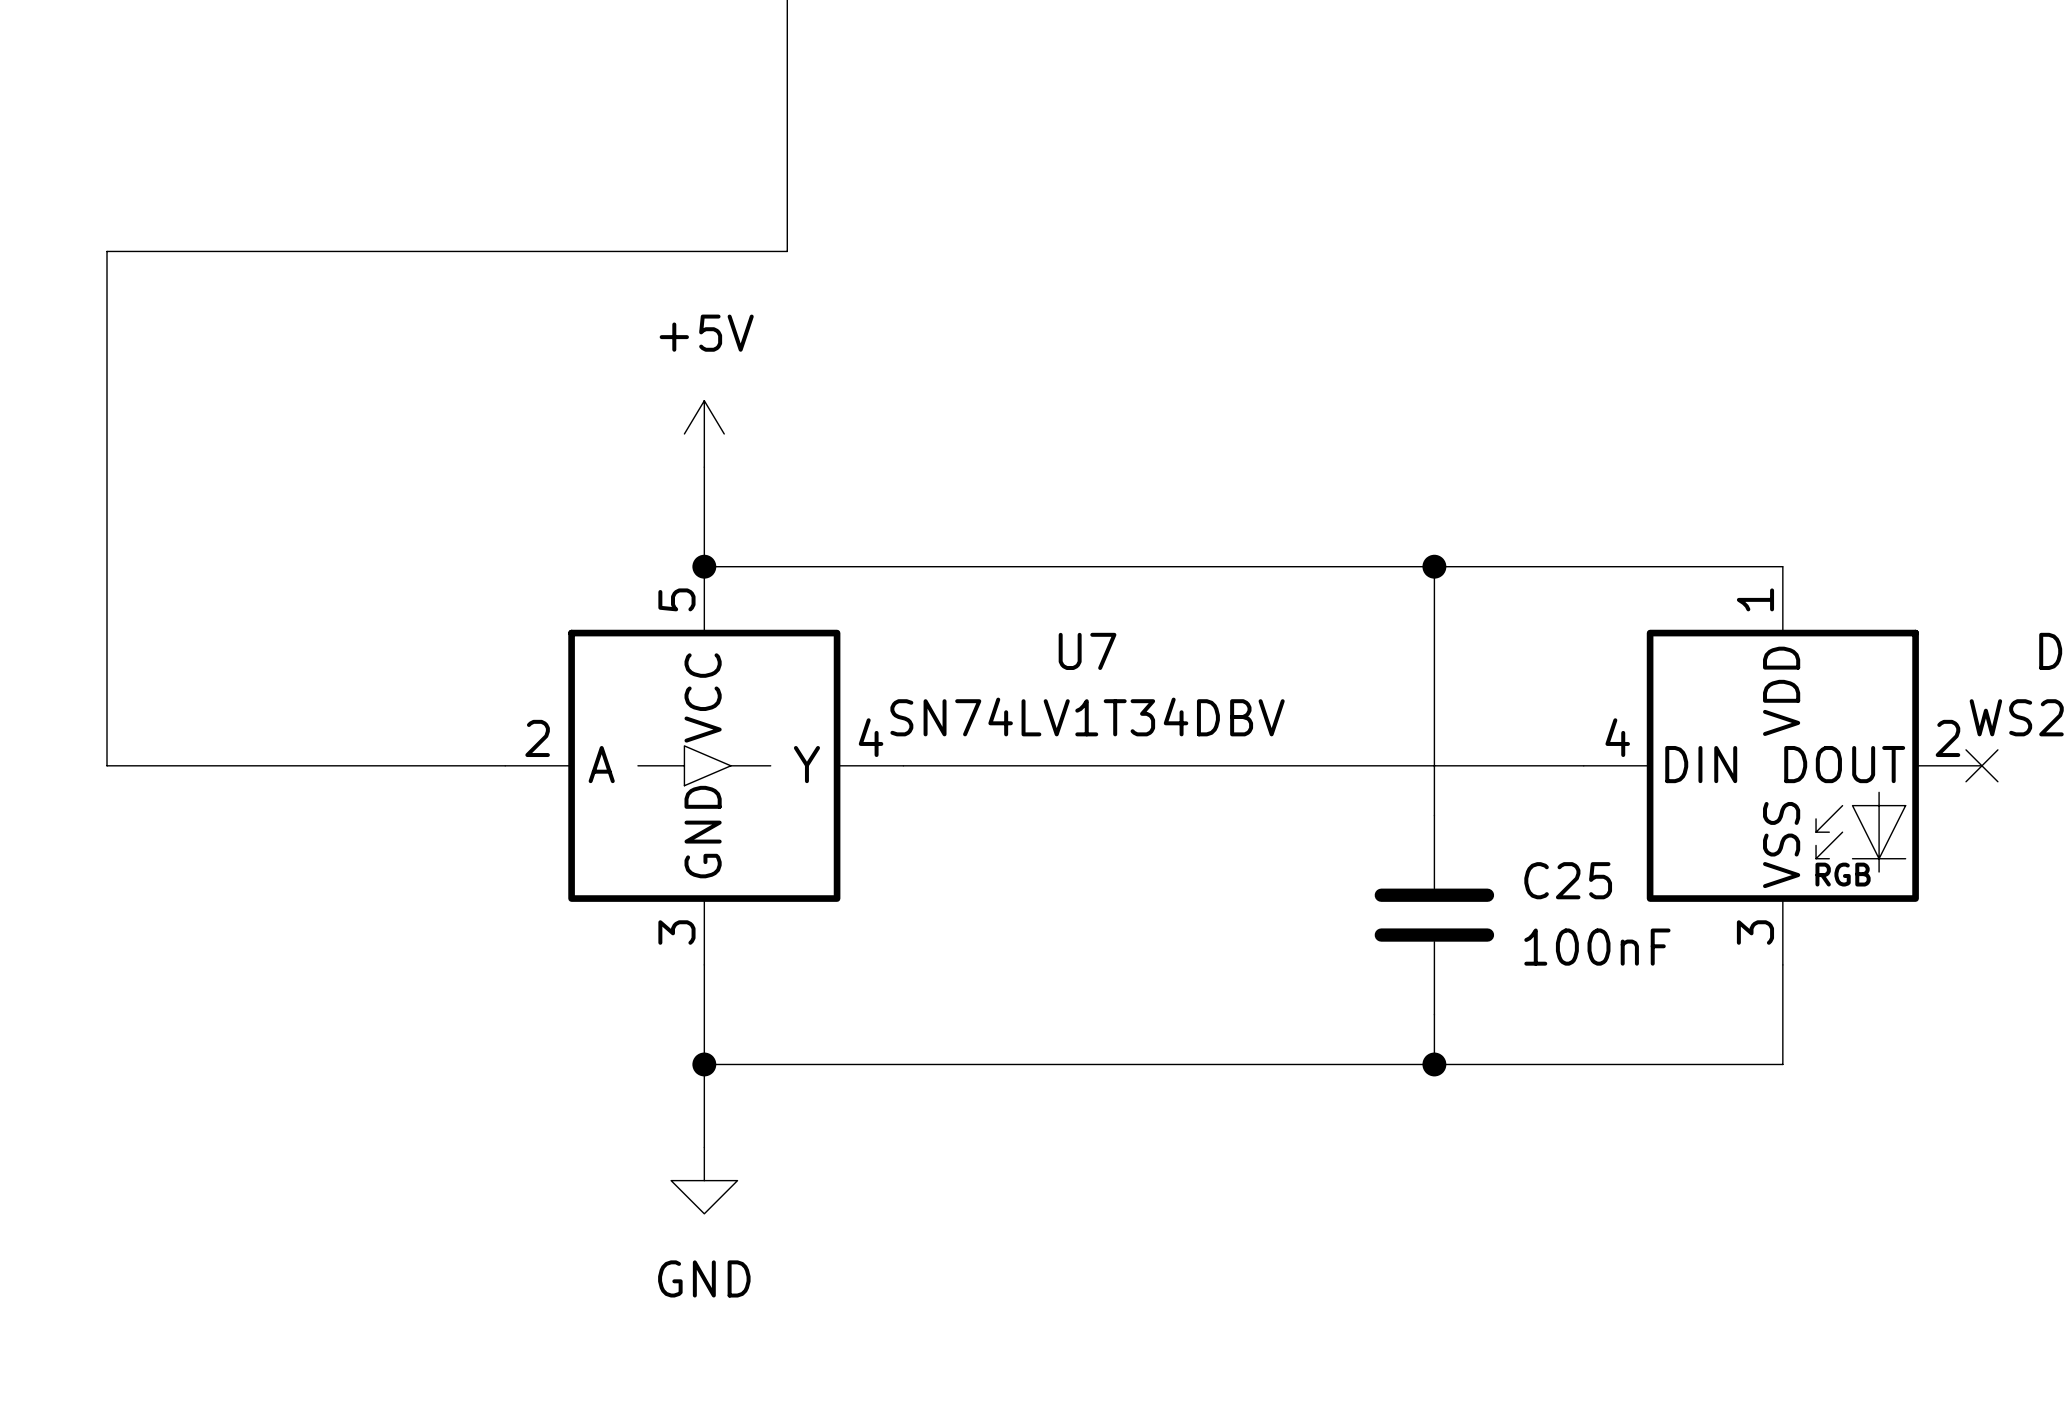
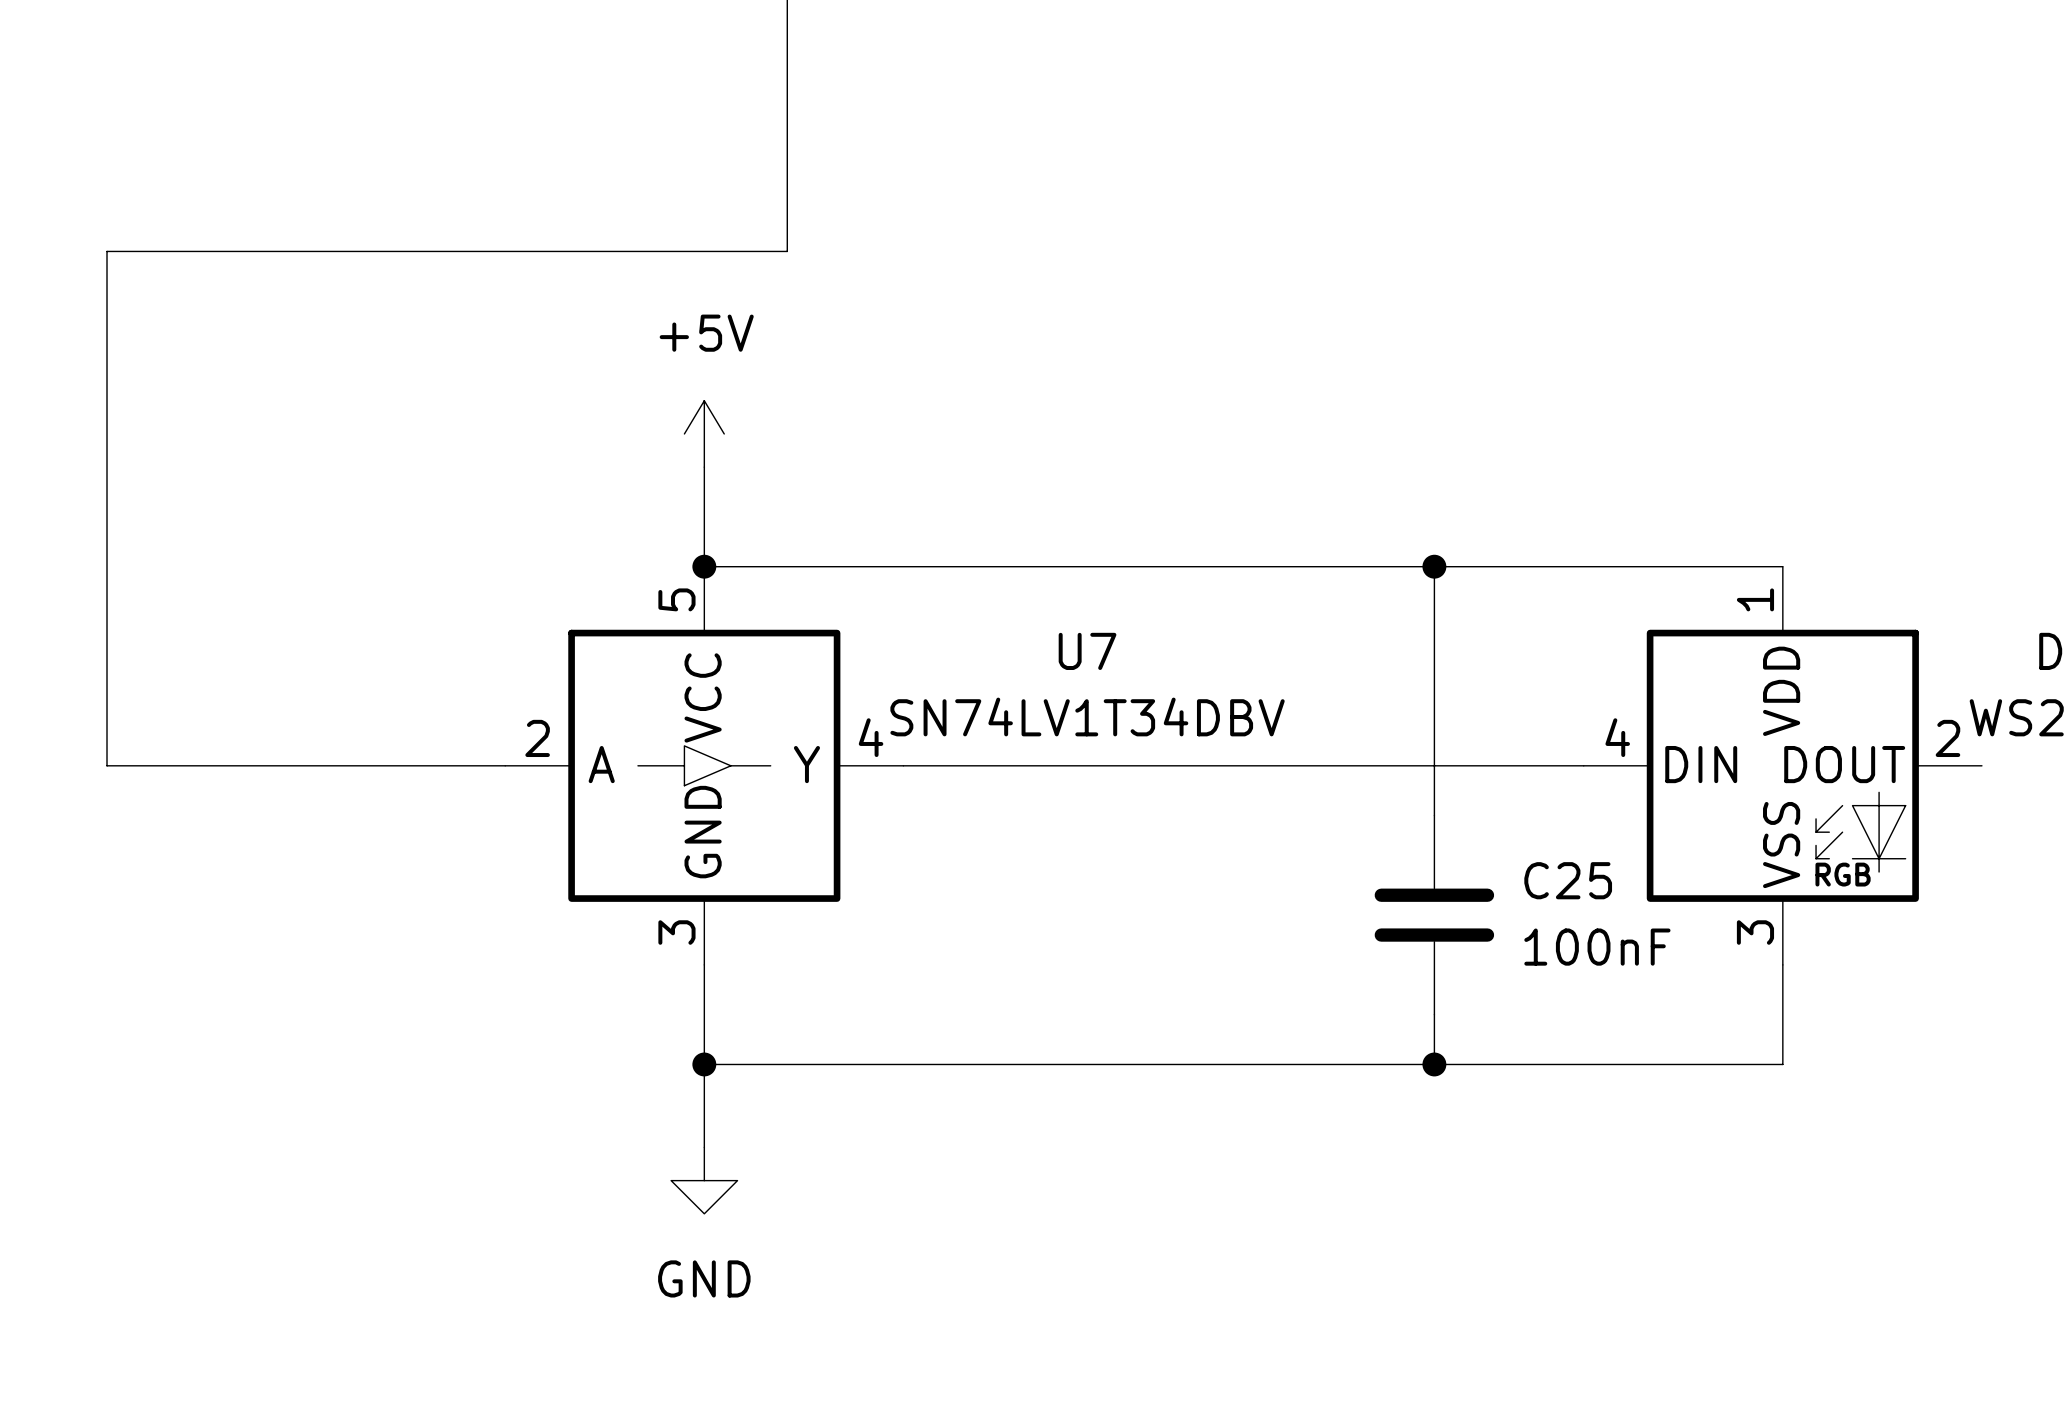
no-connect mark: (1981, 765) -> none

